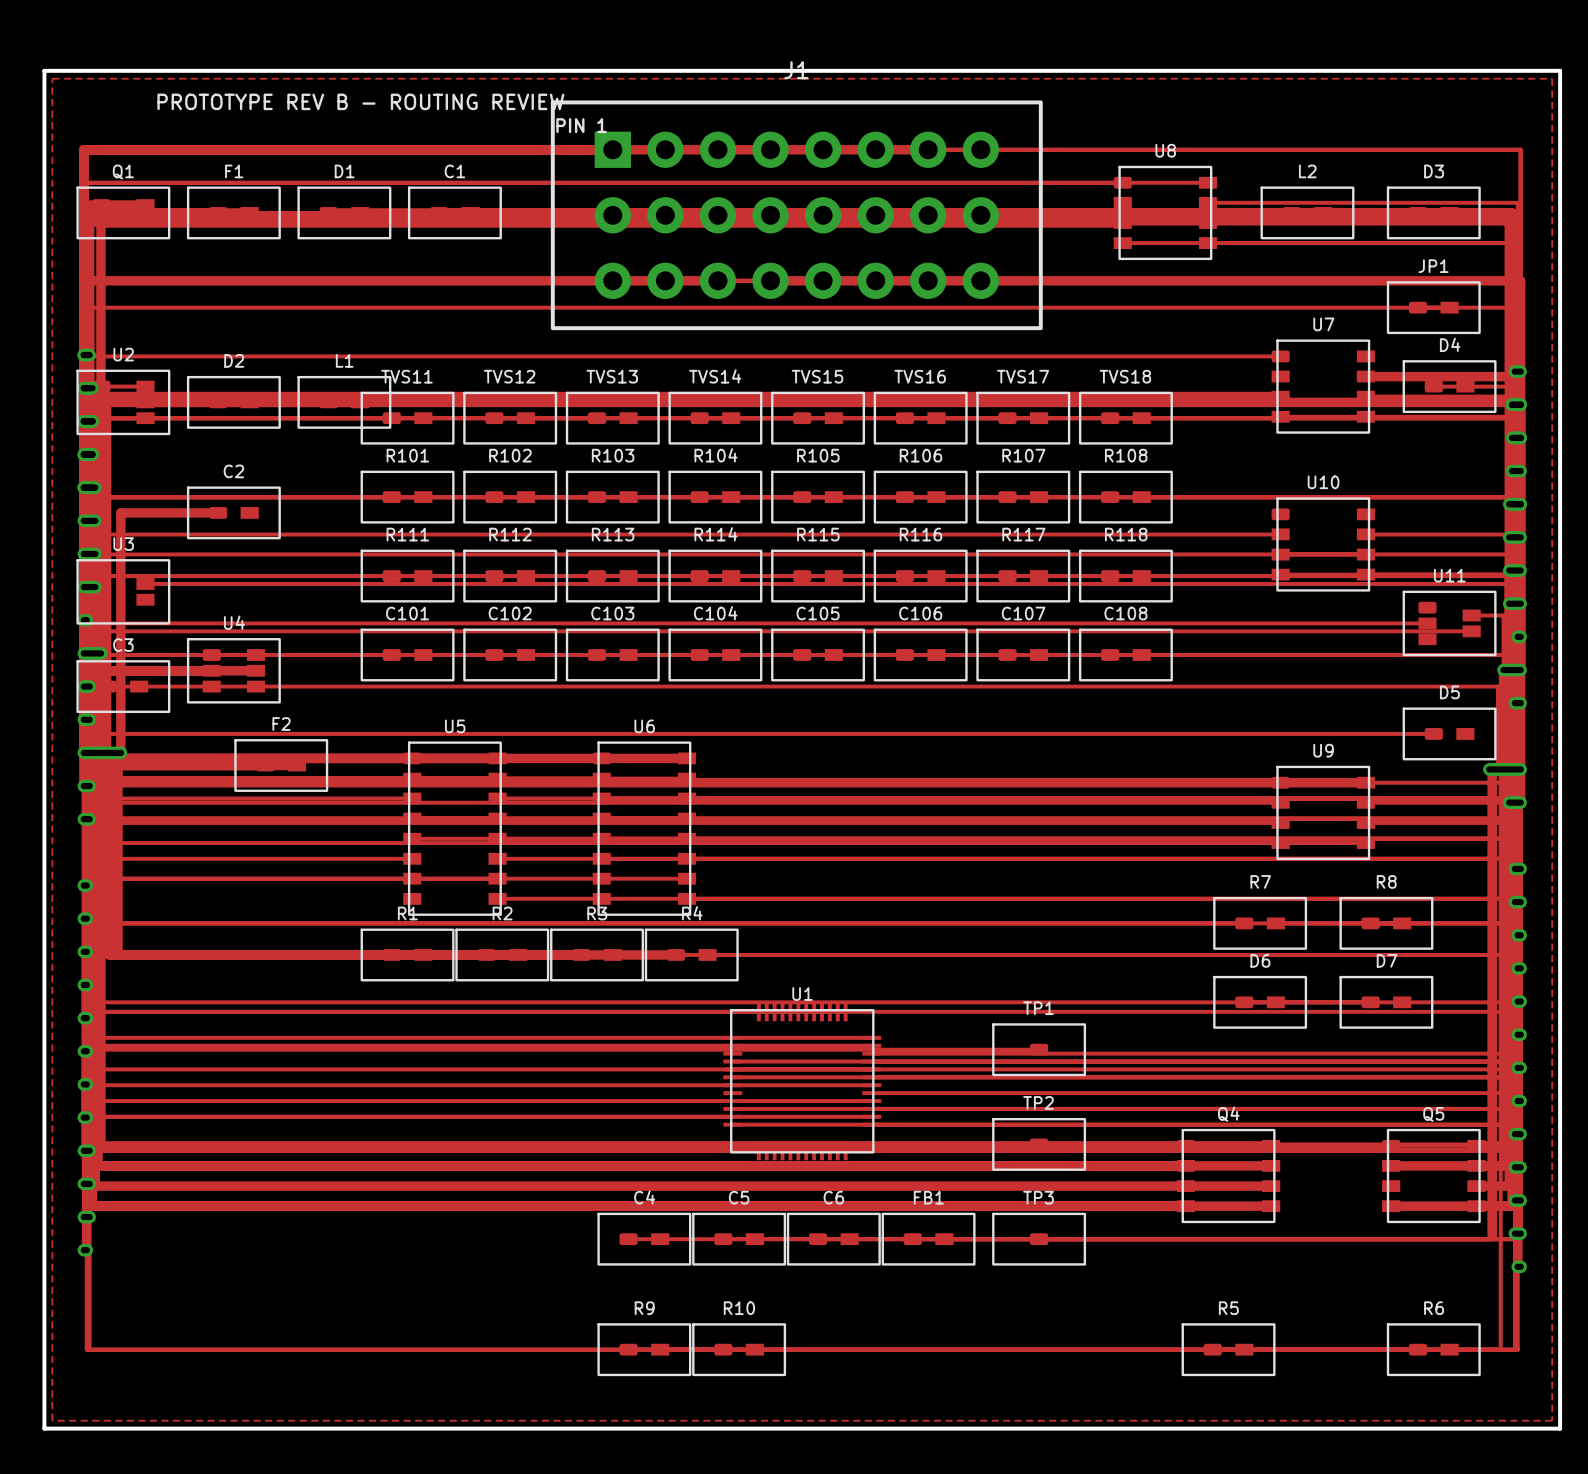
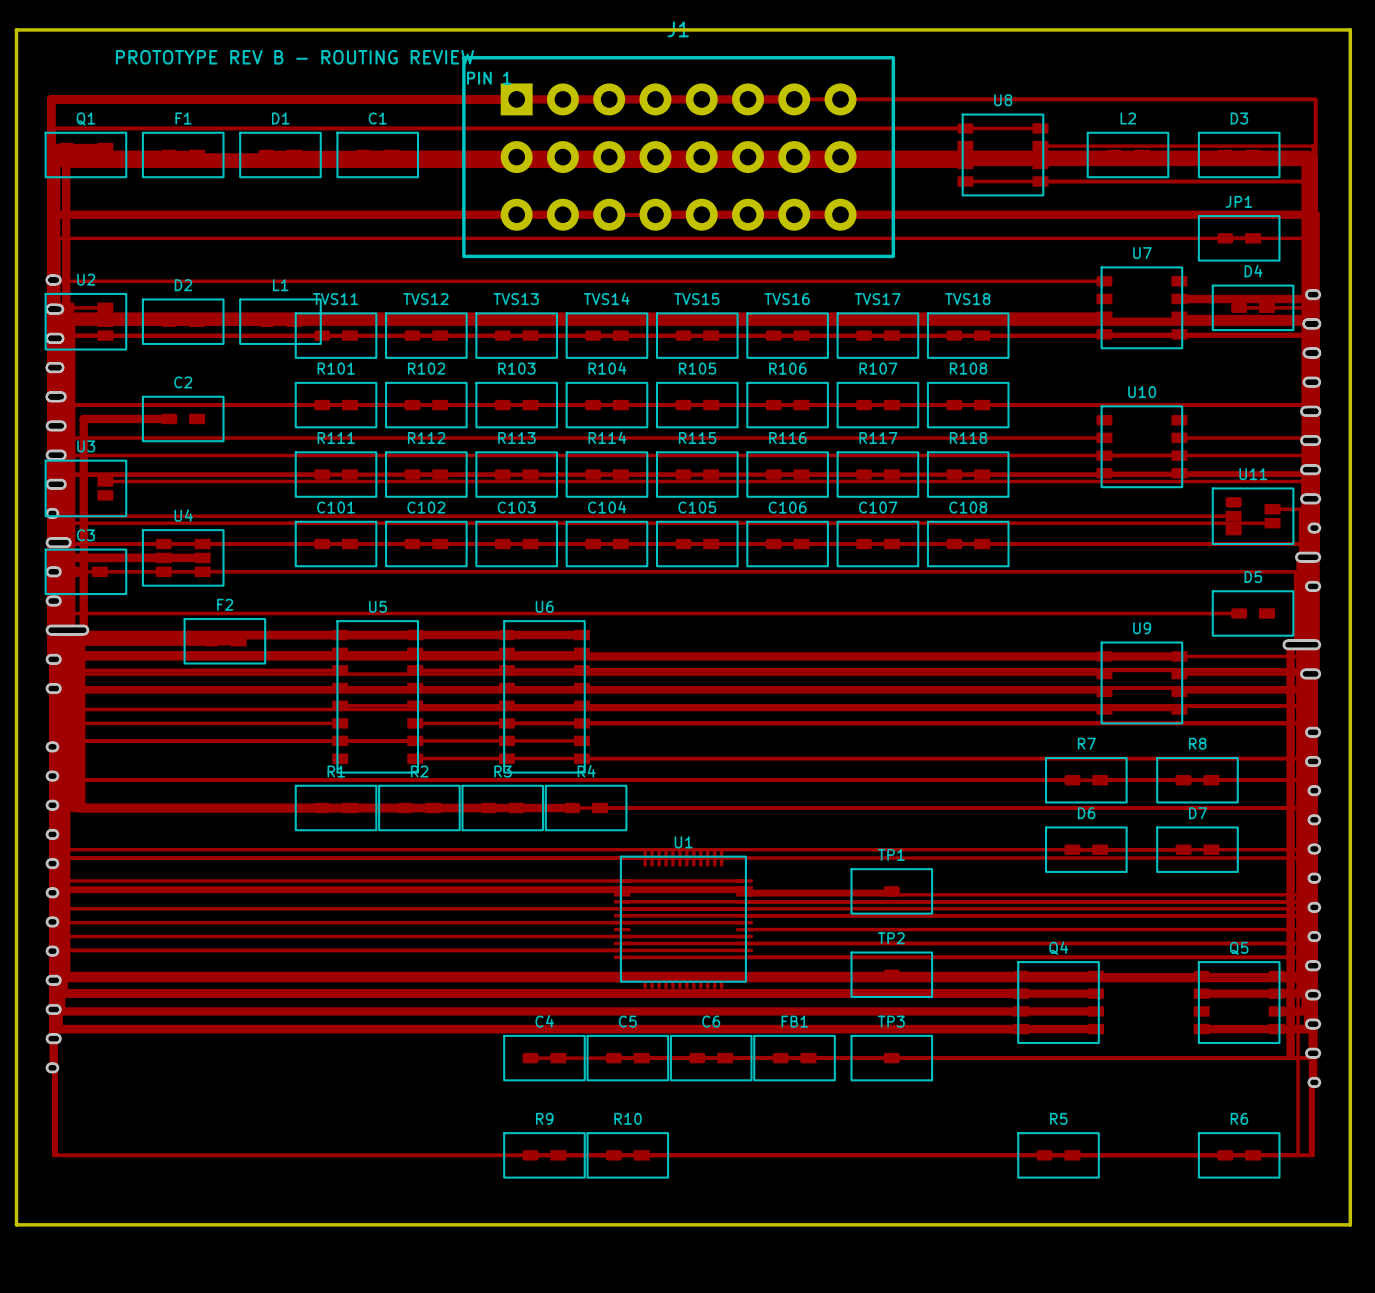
zone outline: (52, 78) (1552, 78) (1552, 1420) (52, 1420) (52, 78) -> none

